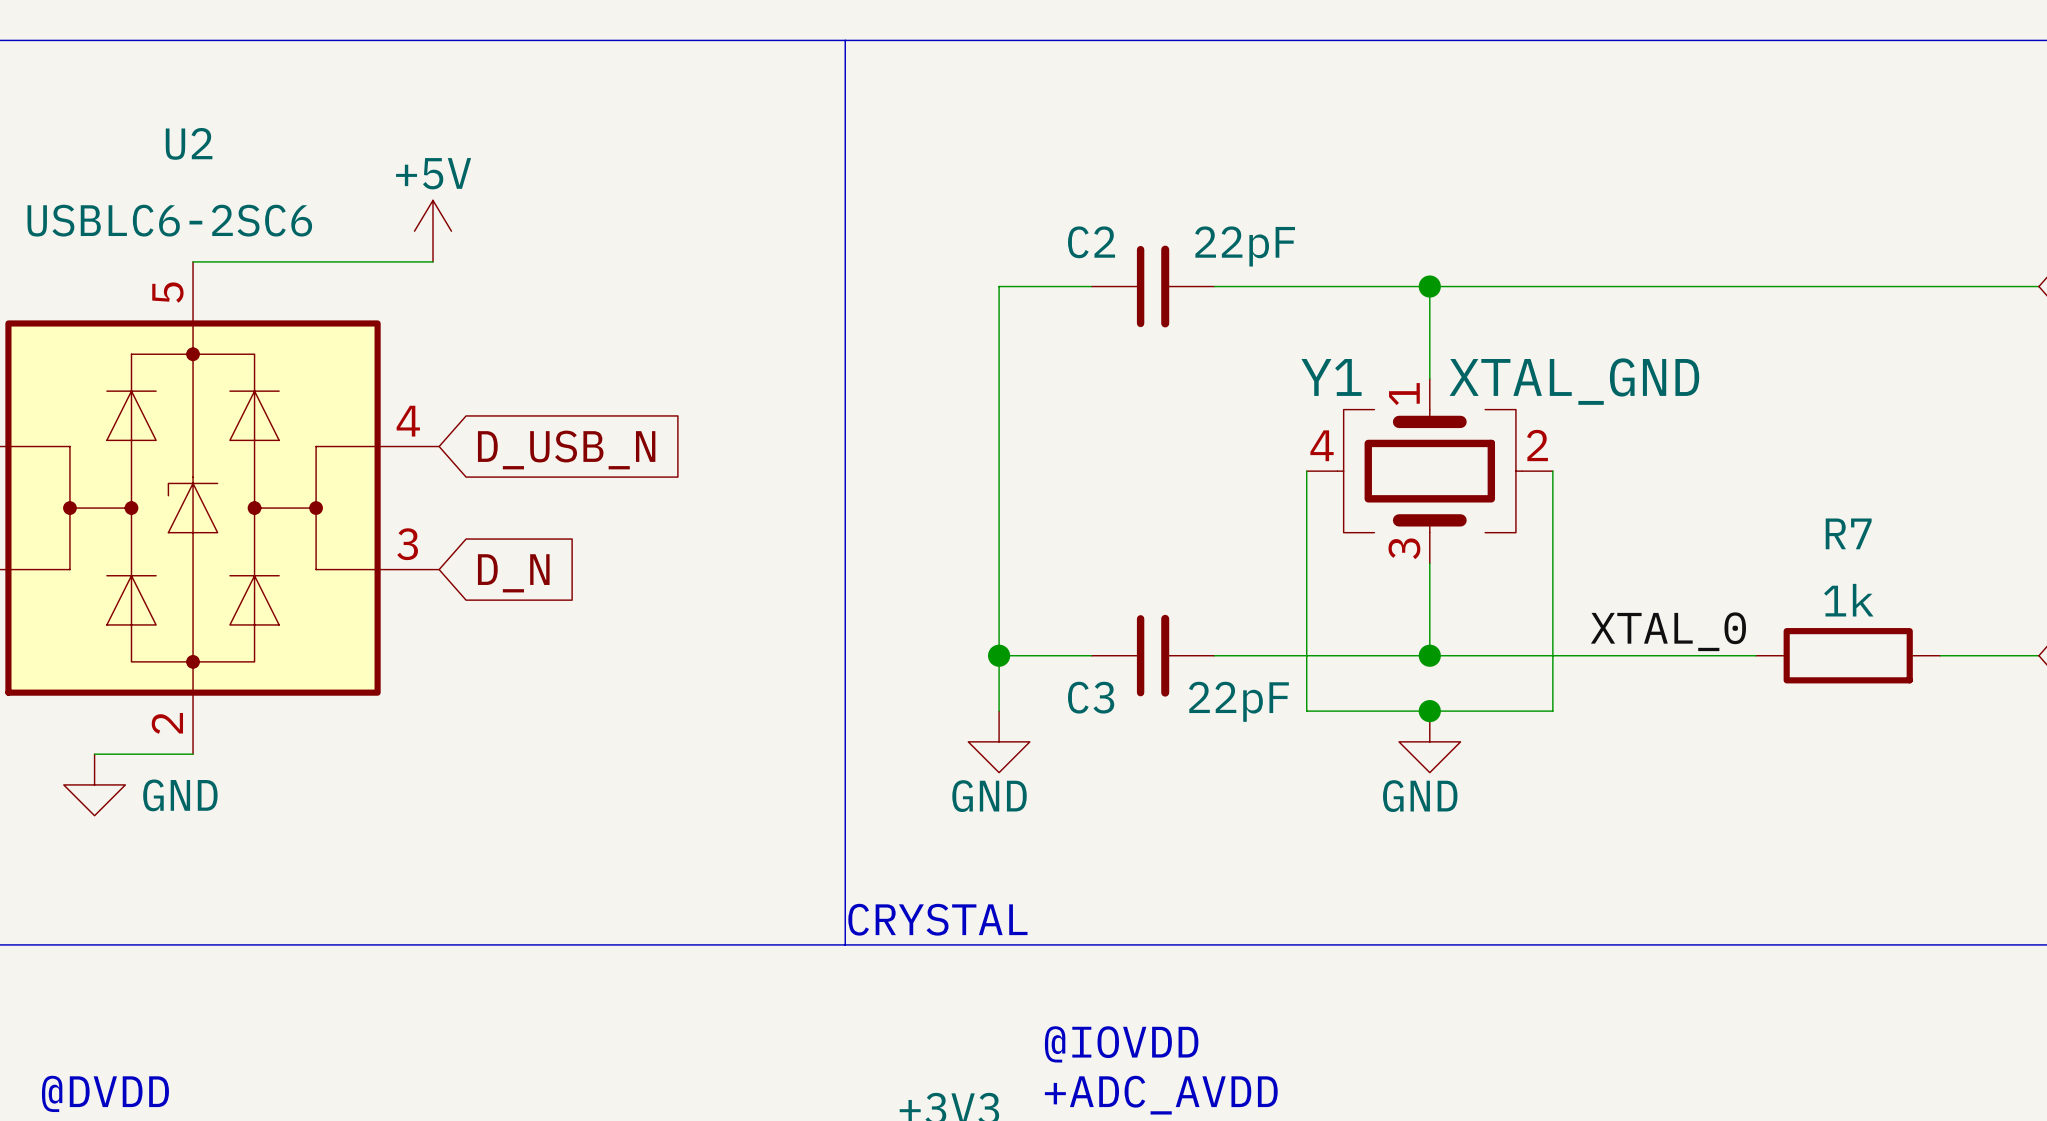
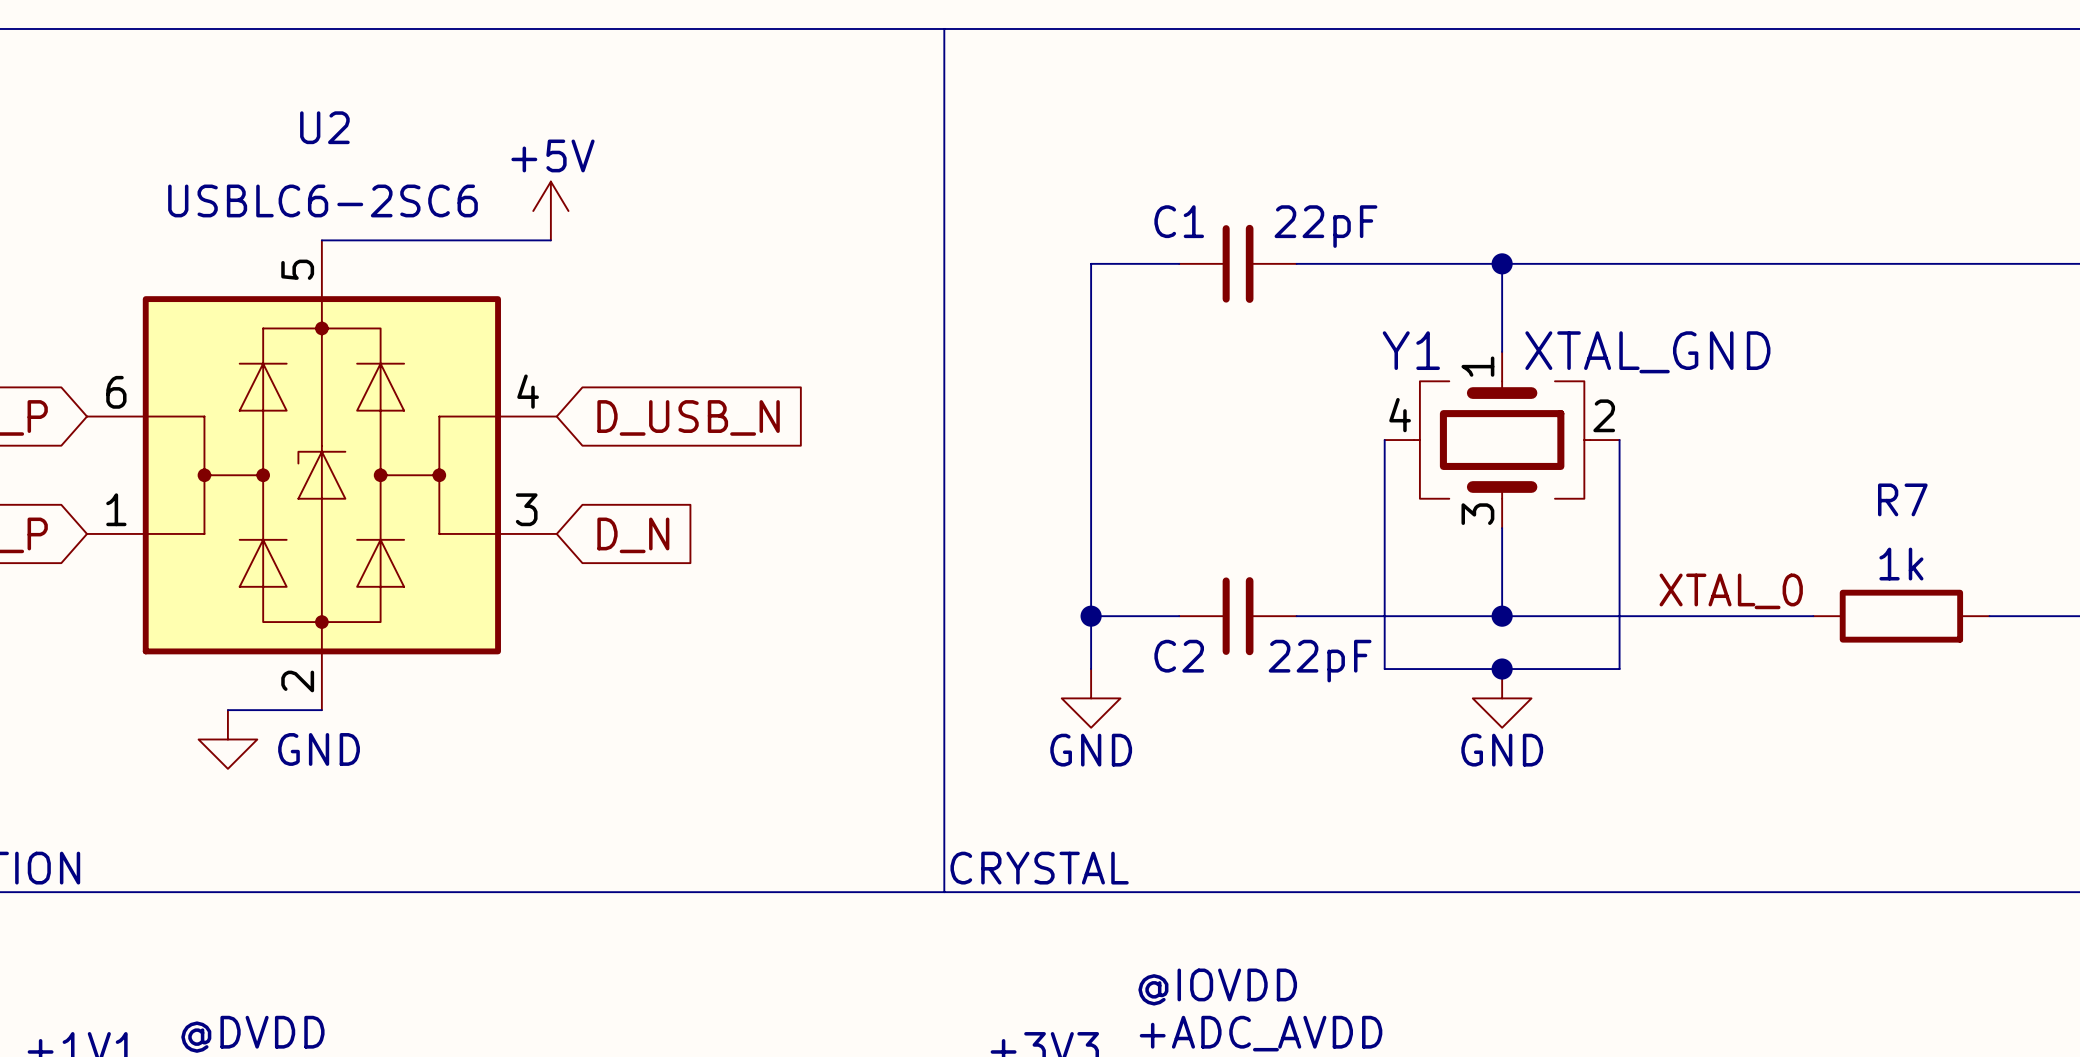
C2 name: C2 (1091, 242) -> C1 (1179, 221)
C3 name: C3 (1091, 697) -> C2 (1179, 656)

